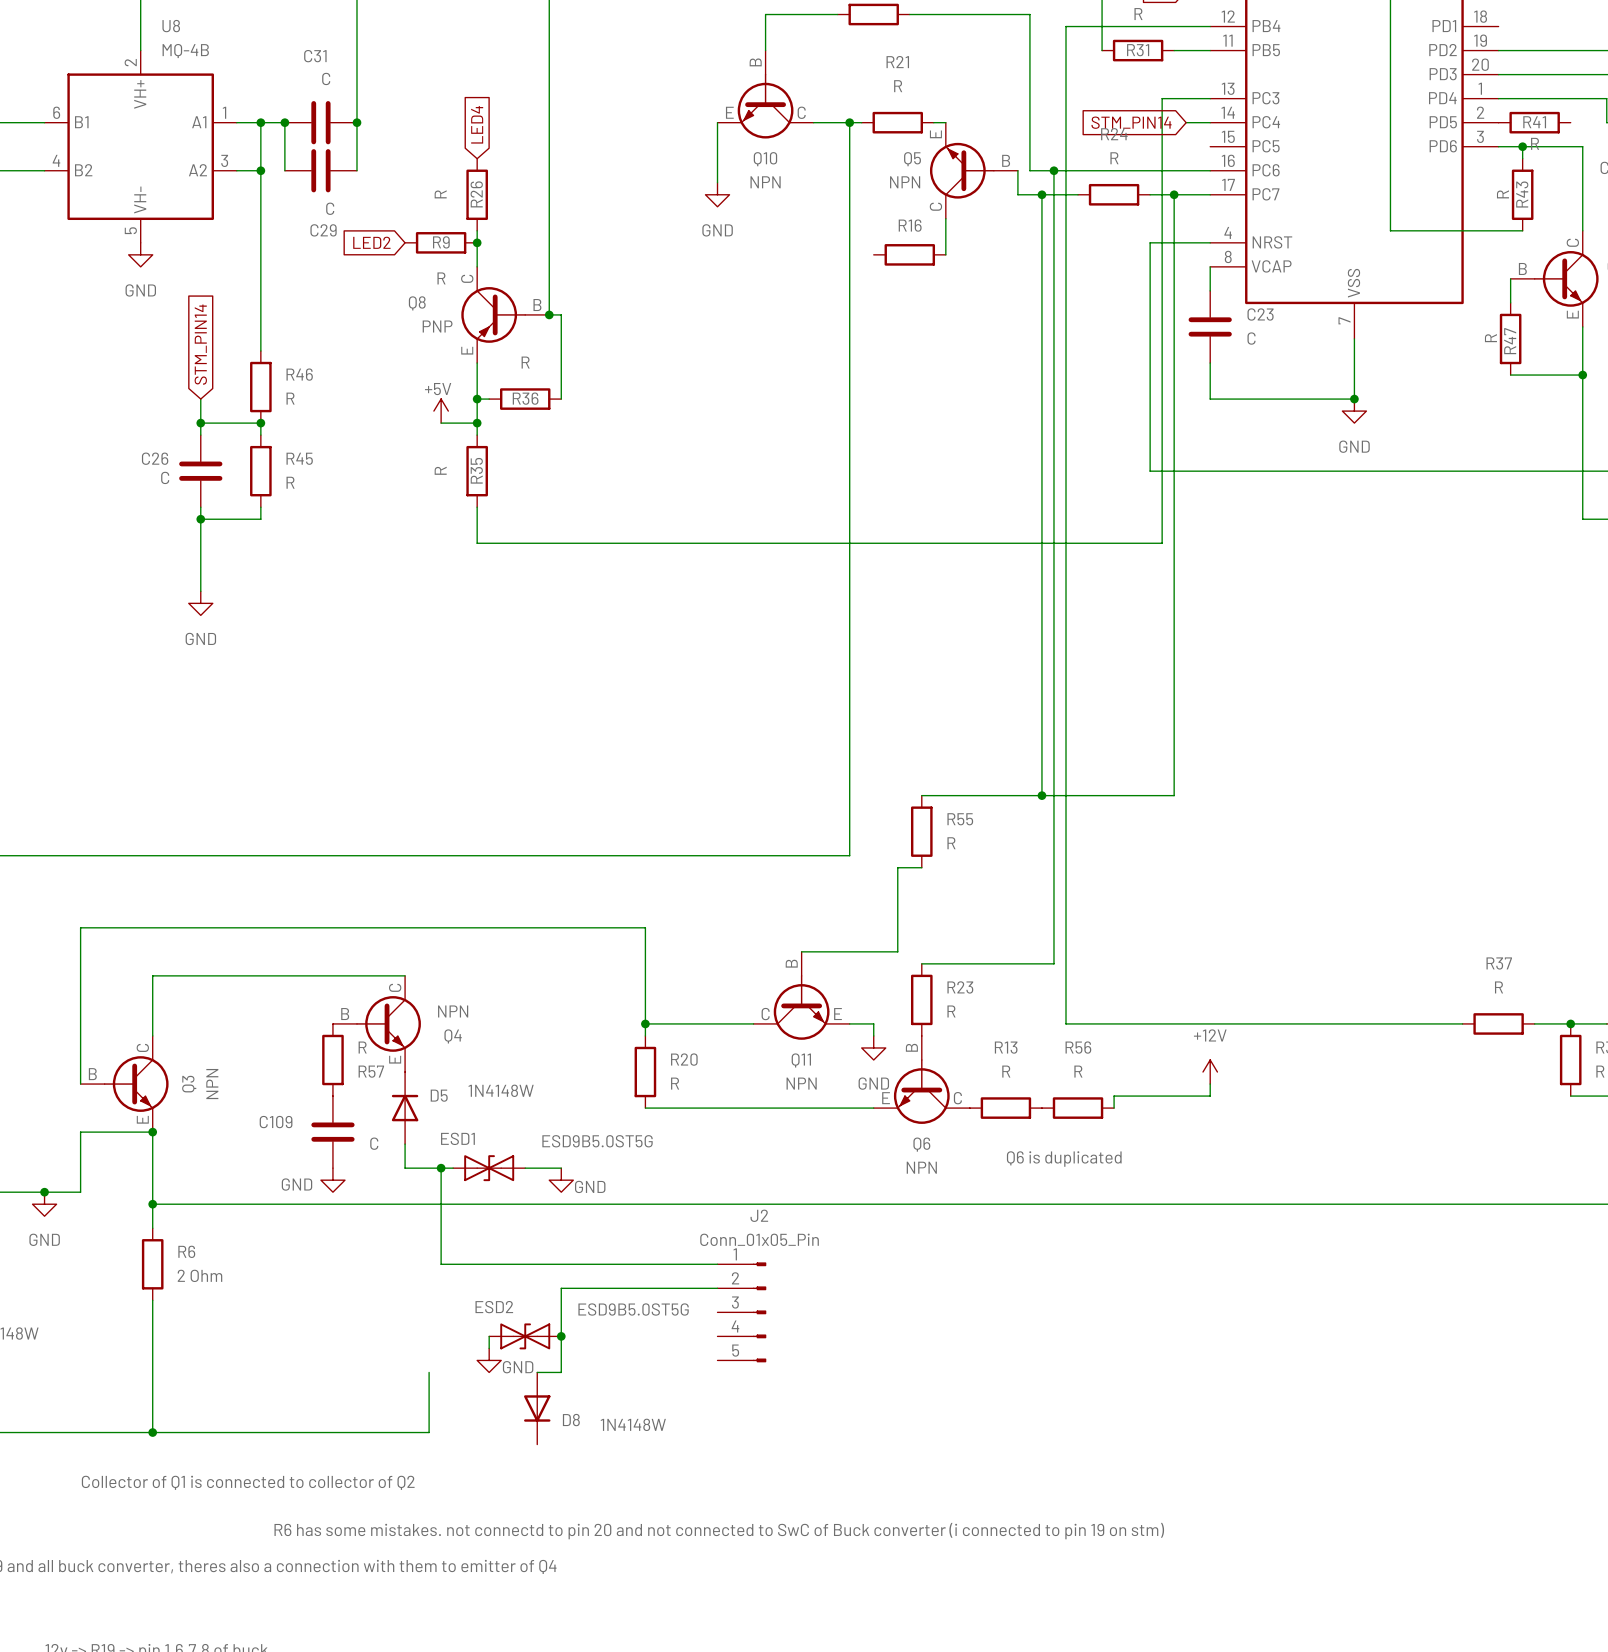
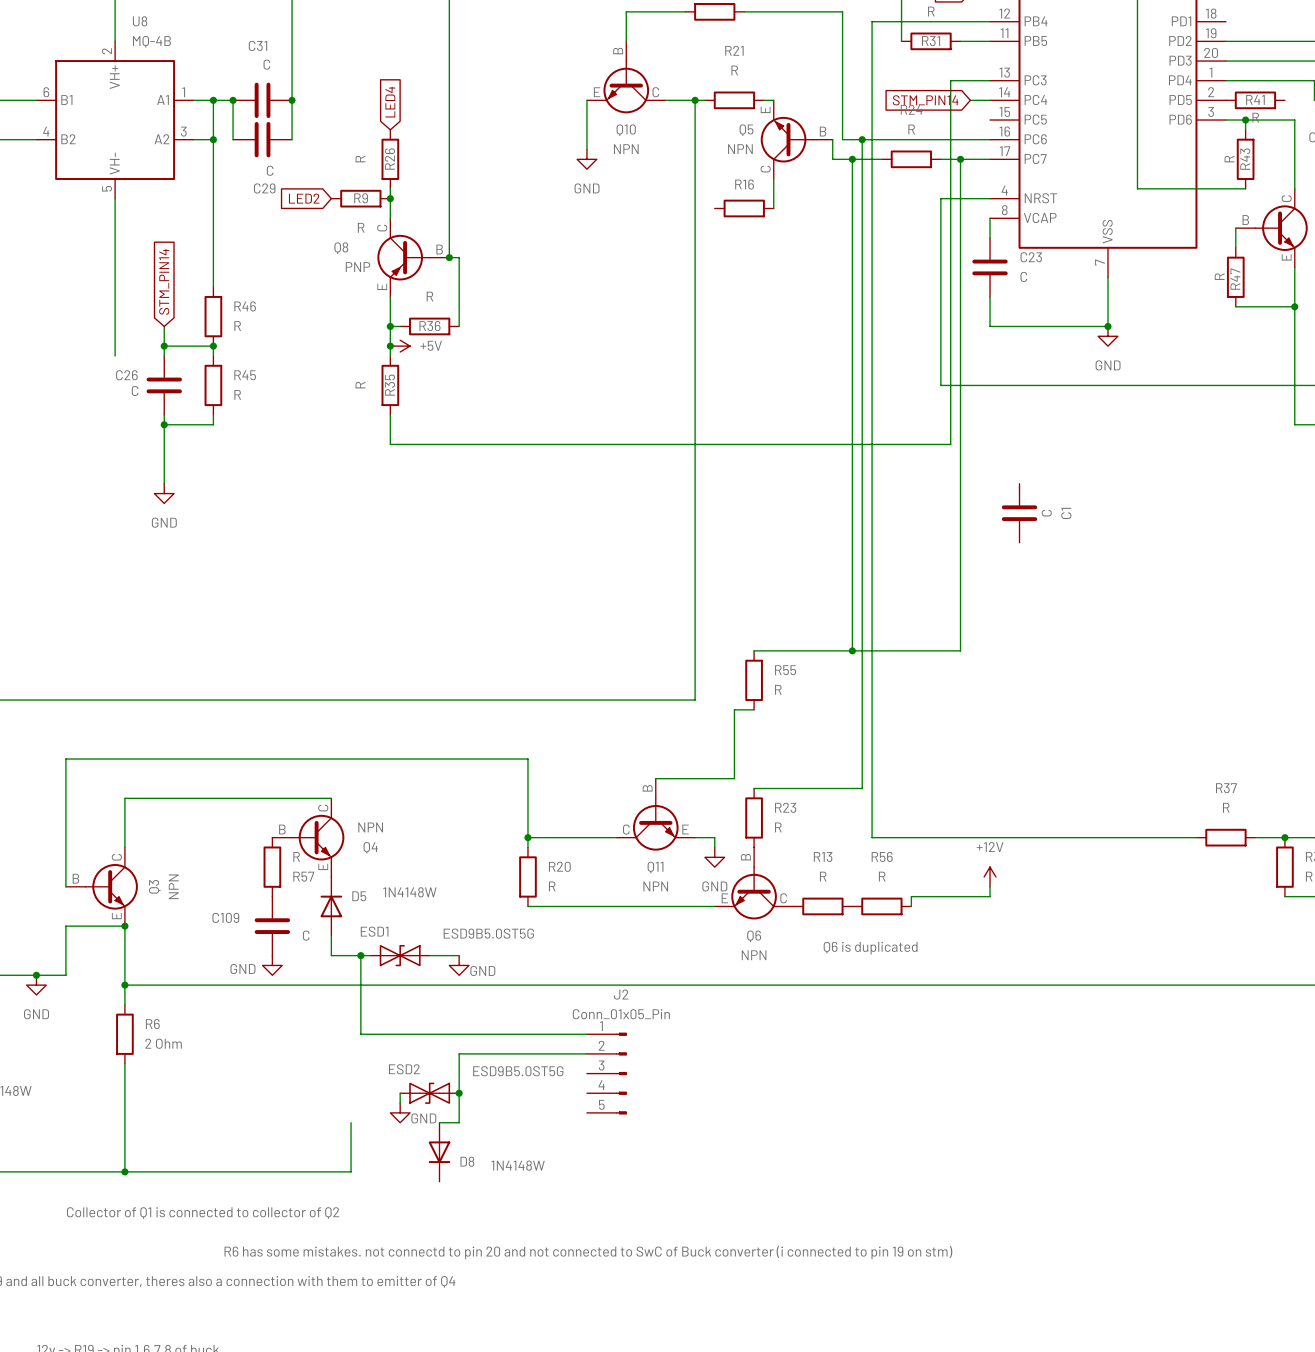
wire: none -> (115, 198) (115, 355)
power symbol: GND (140, 254) -> none
power symbol text position: +5V (438, 389) -> +5V (431, 345)
power symbol rotation: 0° (441, 411) -> 90° clockwise (400, 346)
power symbol position: +5V (441, 411) -> +5V (400, 346)
wire: (441, 423) (477, 423) -> none
C1: none -> C (1019, 513)

